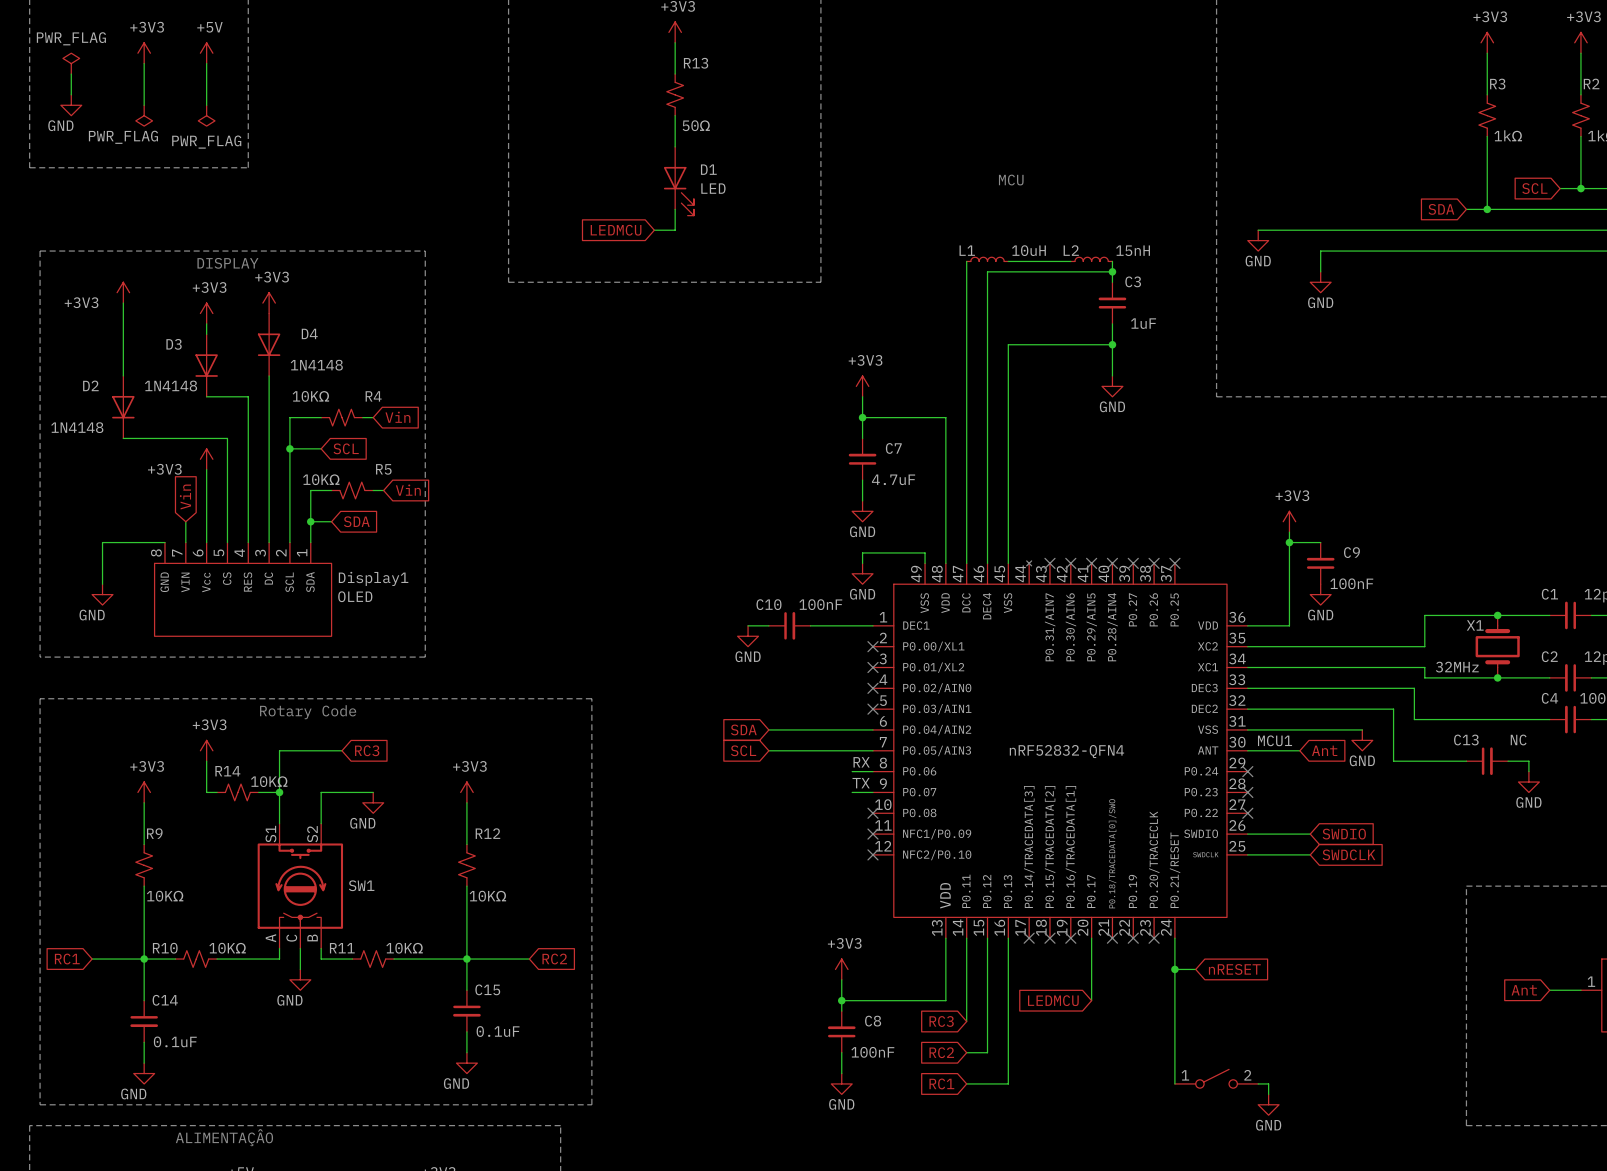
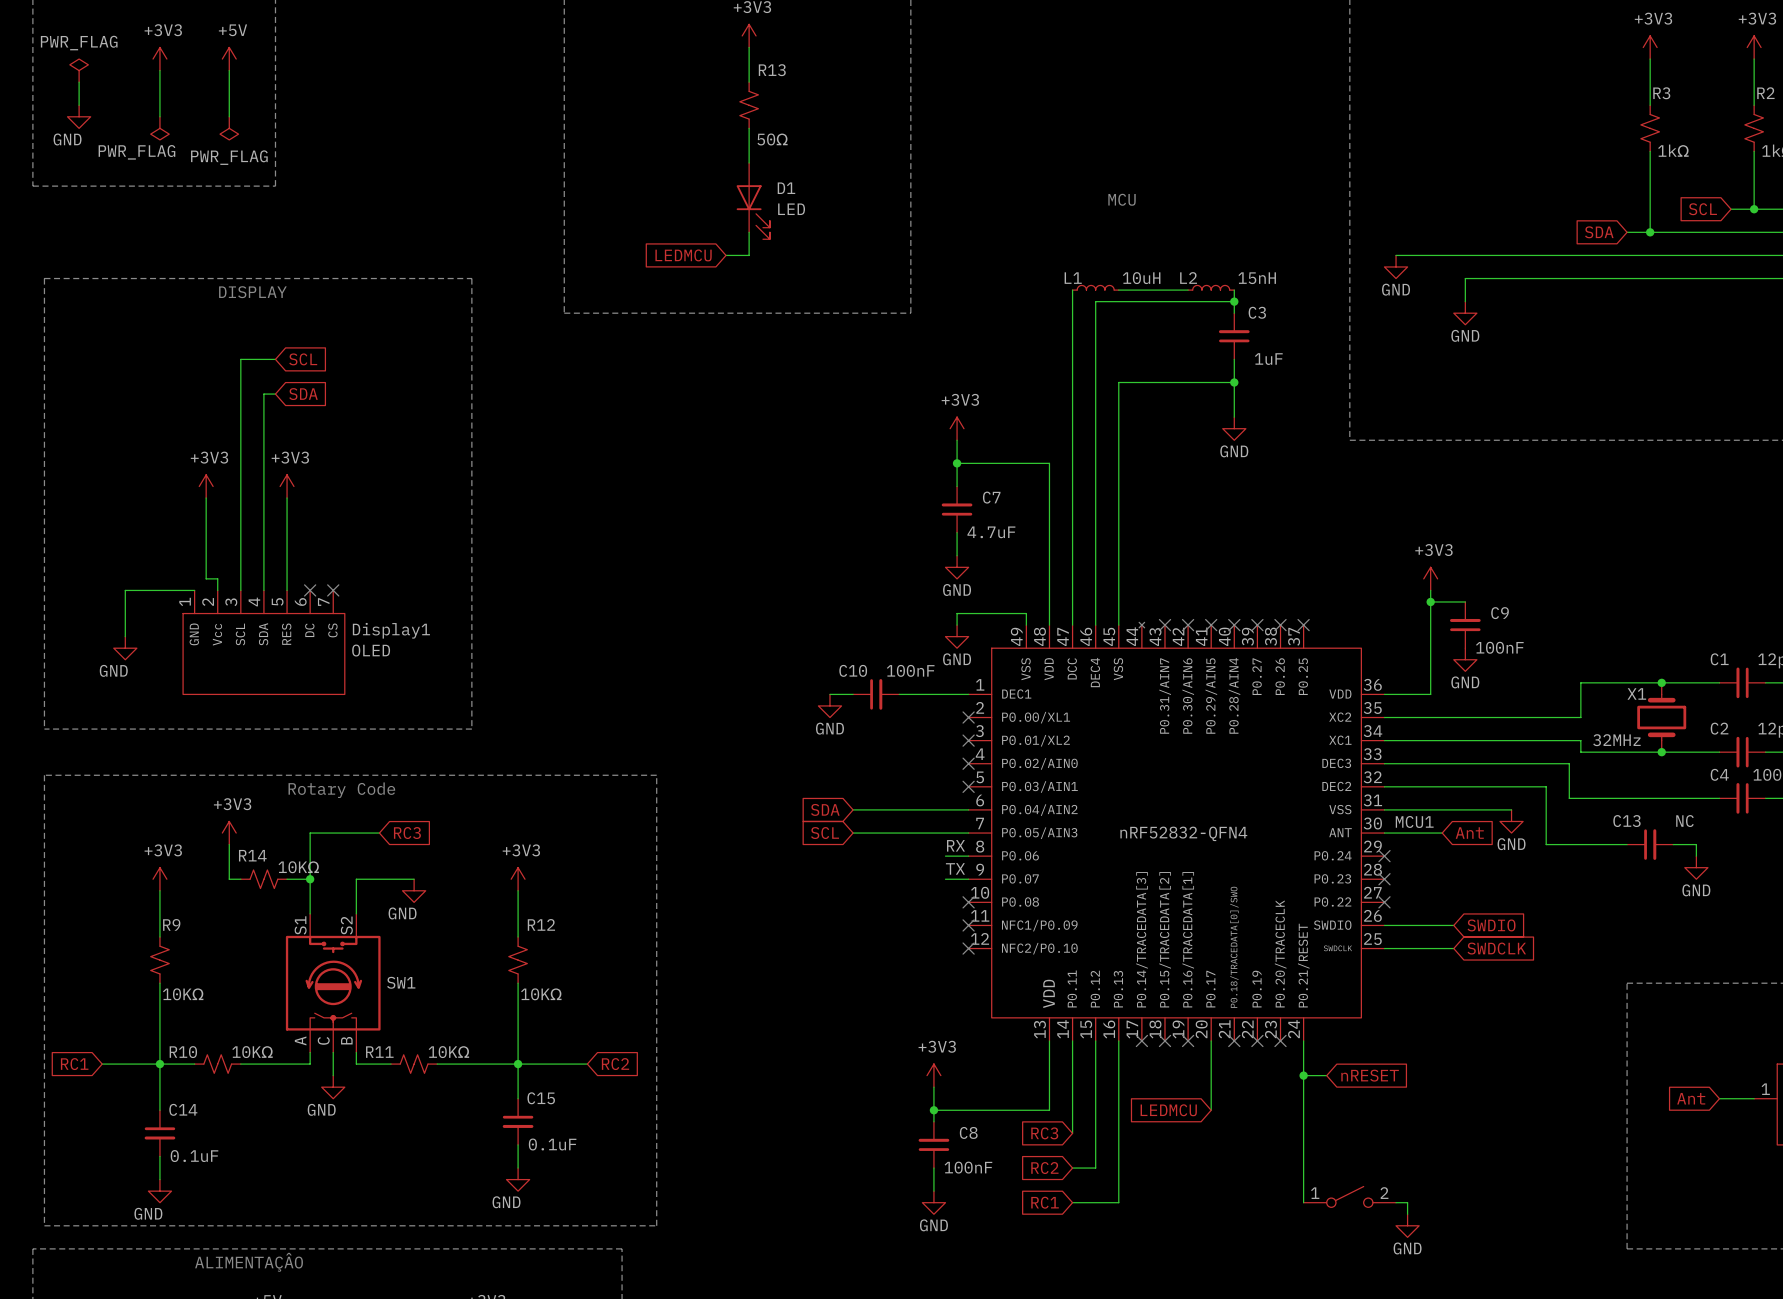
power symbol: +3V3 (123, 292) -> none
wire: (123, 303) (123, 375) -> none
power symbol: +3V3 (269, 303) -> none
power symbol: +3V3 (206, 313) -> none
wire: (206, 323) (206, 334) -> none
wire: none -> (275, 359) (240, 359) (240, 590)
D4: 1N4148 (269, 344) -> none
wire: none -> (275, 394) (263, 394) (263, 590)
D3: 1N4148 (206, 365) -> none
wire: (269, 375) (269, 542) -> none
wire: (206, 396) (248, 396) (248, 542) -> none
D2: 1N4148 (123, 407) -> none
wire: (321, 417) (289, 417) (289, 542) -> none
R4: 10KΩ (341, 417) -> none
wire: (362, 417) (373, 417) -> none
global label: Vin (397, 417) -> none
wire: (123, 438) (227, 438) (227, 542) -> none
power symbol: none -> +3V3 (206, 486)
power symbol: none -> +3V3 (287, 486)
wire: none -> (206, 498) (206, 578) (217, 578) (217, 590)
wire: none -> (287, 498) (287, 590)
wire: (289, 448) (321, 448) -> none
junction: (289, 448) -> none
global label position: SCL (346, 448) -> SCL (303, 359)
power symbol: +3V3 (206, 459) -> none
wire: (206, 469) (206, 542) -> none
wire: (331, 490) (310, 490) (310, 542) -> none
R5: 10KΩ (352, 490) -> none
wire: (373, 490) (383, 490) -> none
global label: Vin (408, 490) -> none
global label: Vin (185, 497) -> none
wire: (185, 521) (185, 542) -> none
wire: (310, 521) (331, 521) -> none
junction: (310, 521) -> none
global label position: SDA (356, 521) -> SDA (303, 394)
no-connect mark: none -> (310, 590)
no-connect mark: none -> (333, 590)
Display1 symbol: [154, 542, 332, 637] -> [183, 590, 345, 695]
wire: (164, 542) (102, 542) (102, 584) -> (194, 590) (125, 590) (125, 636)
power symbol position: GND (102, 594) -> GND (125, 648)

